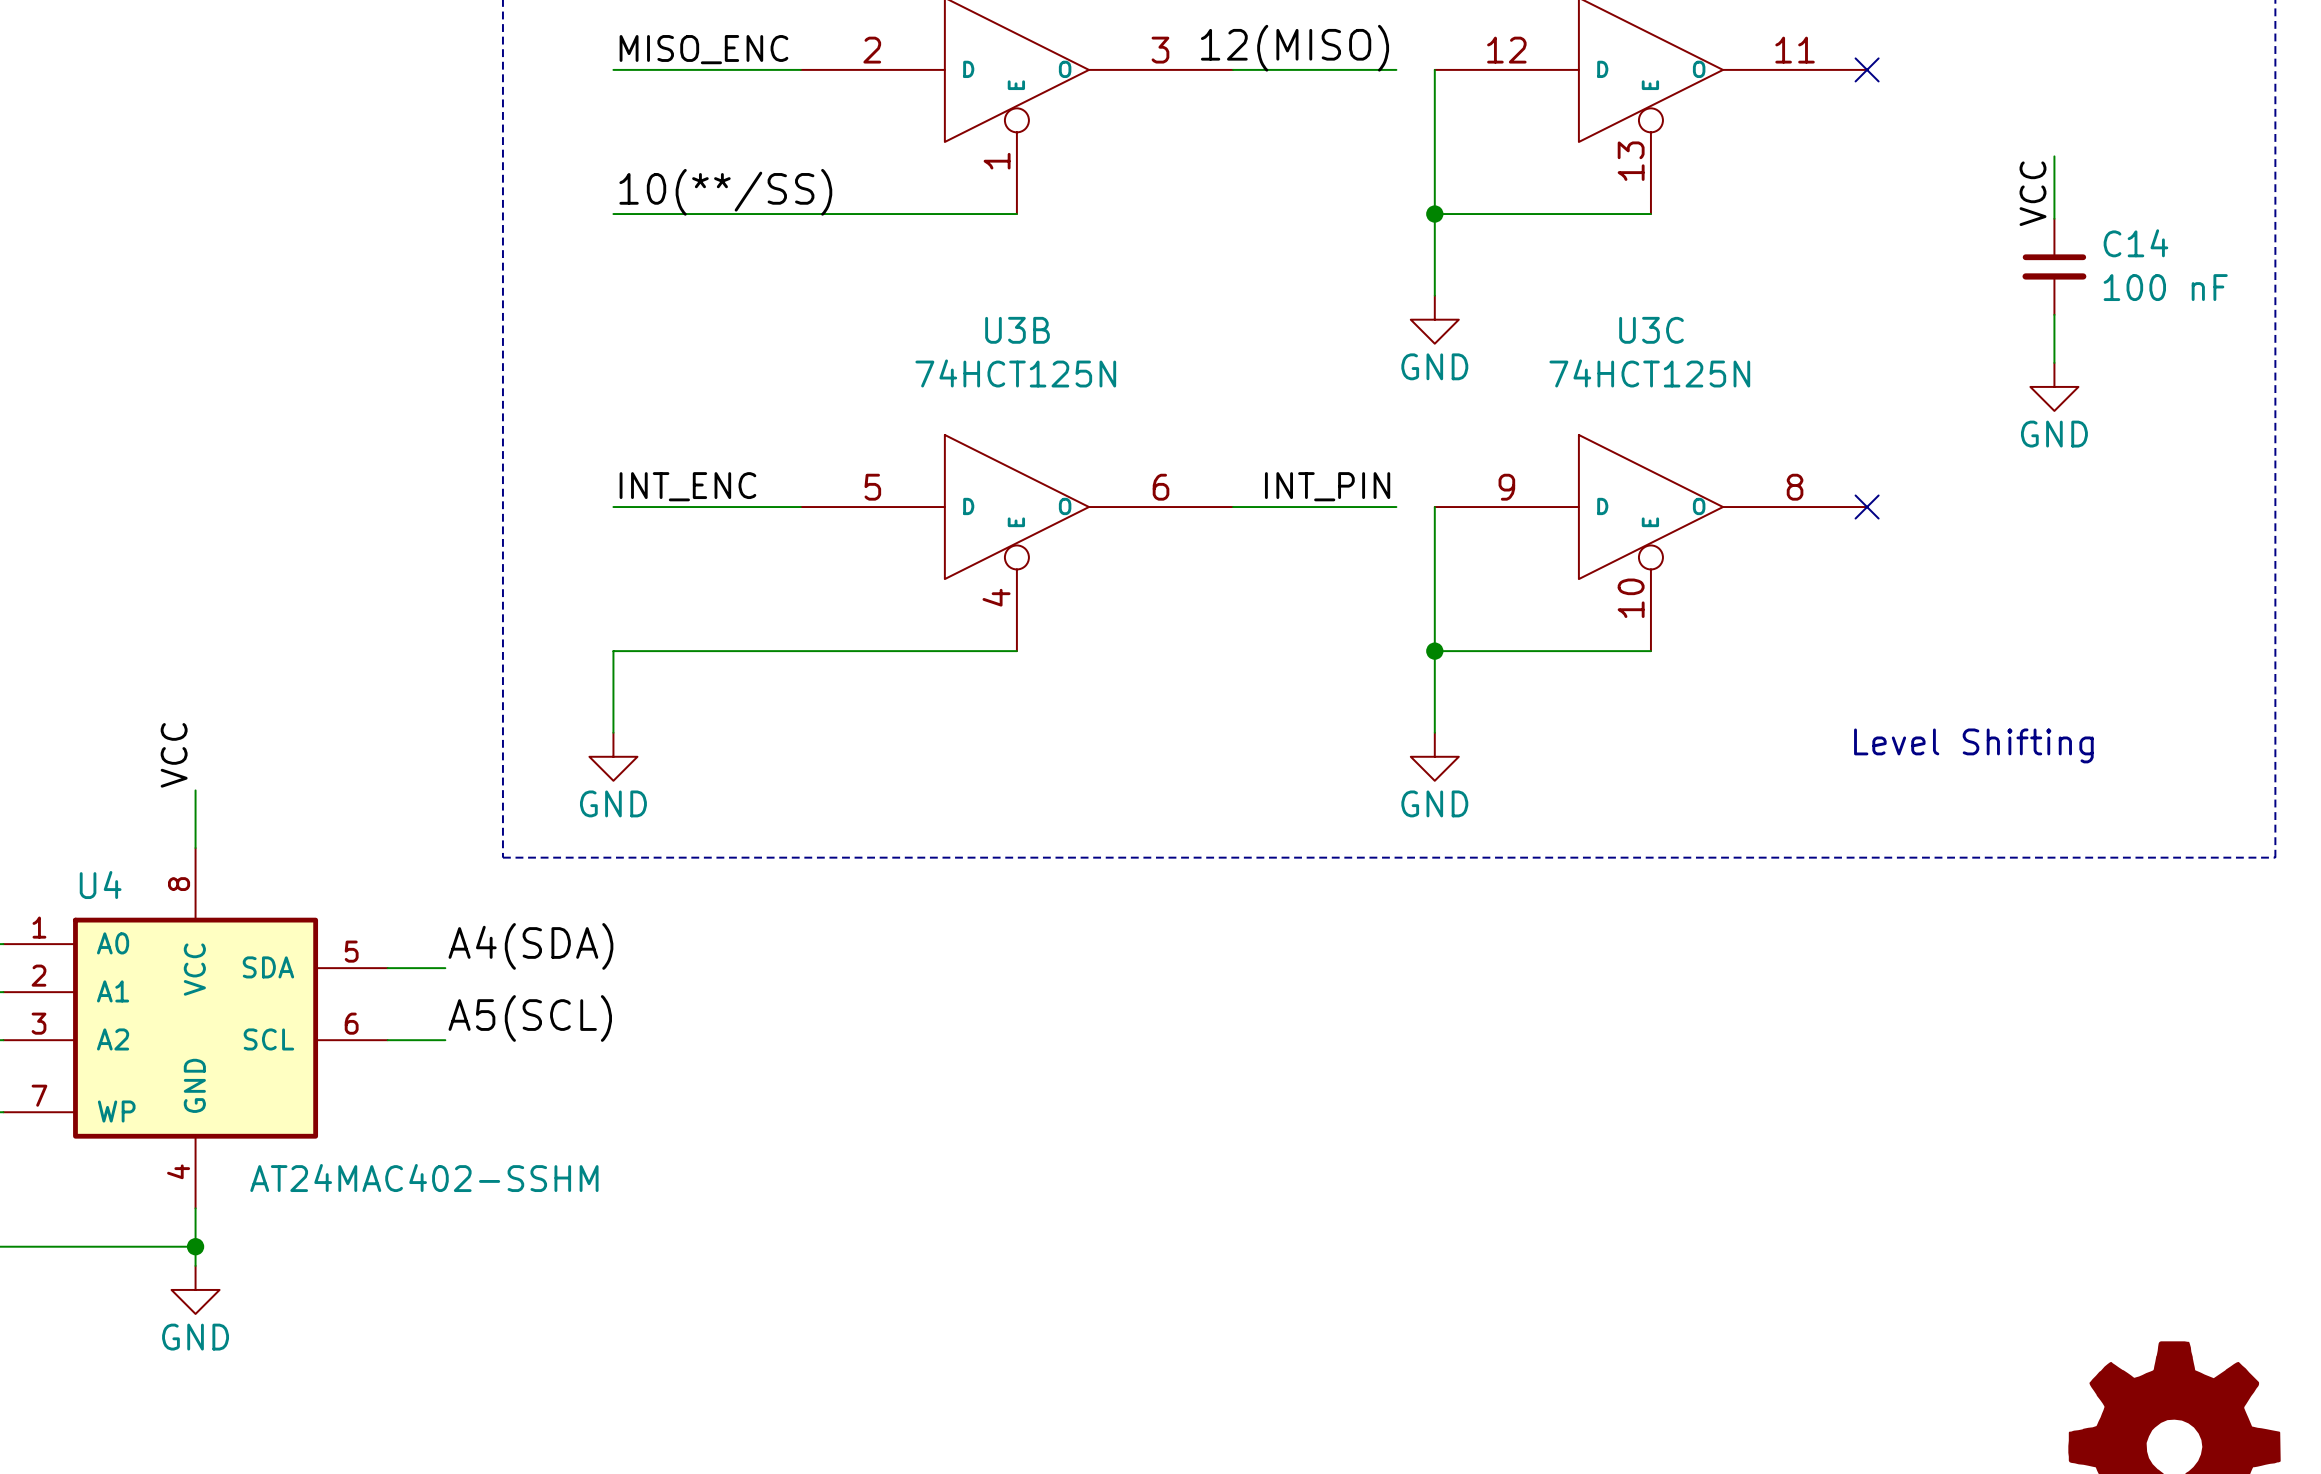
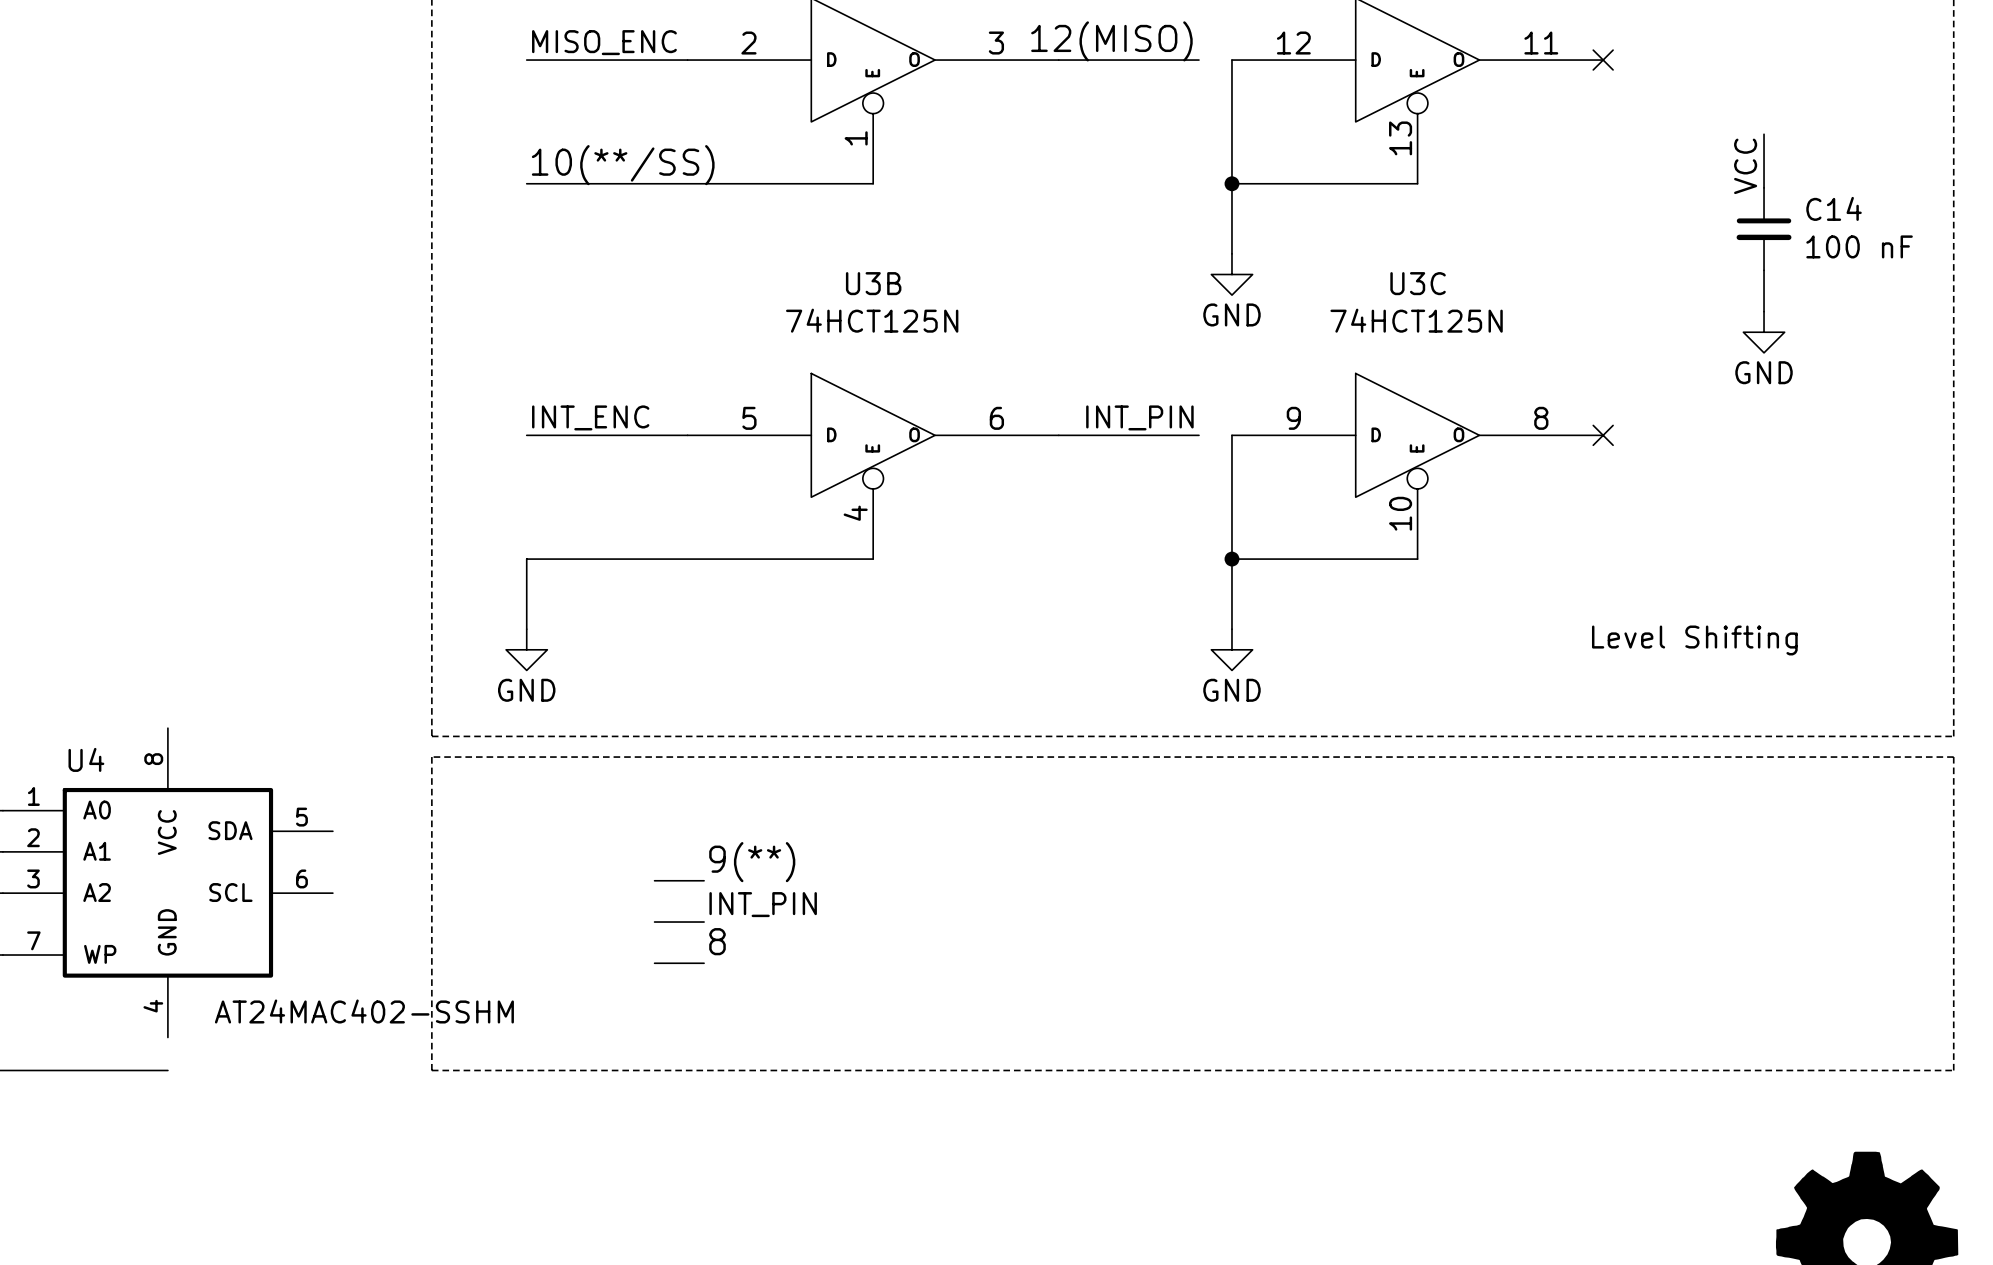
label: VCC (174, 755) -> none
wire: (195, 790) (195, 848) -> none
line: none -> (431, 757) (1953, 757) (1953, 1070) (431, 1070) (431, 757)
label: A4(SDA) (530, 946) -> none
wire: (387, 968) (445, 968) -> (654, 922) (704, 922)
label: none -> 9(**) (752, 862)
label: A5(SCL) (530, 1018) -> none
wire: (387, 1040) (445, 1040) -> (654, 880) (704, 880)
label: none -> INT_PIN (763, 904)
label: none -> 8 (717, 941)
wire: none -> (654, 963) (704, 963)
wire: (195, 1208) (195, 1265) -> none
junction: (195, 1246) -> none
power symbol: GND (195, 1289) -> none

